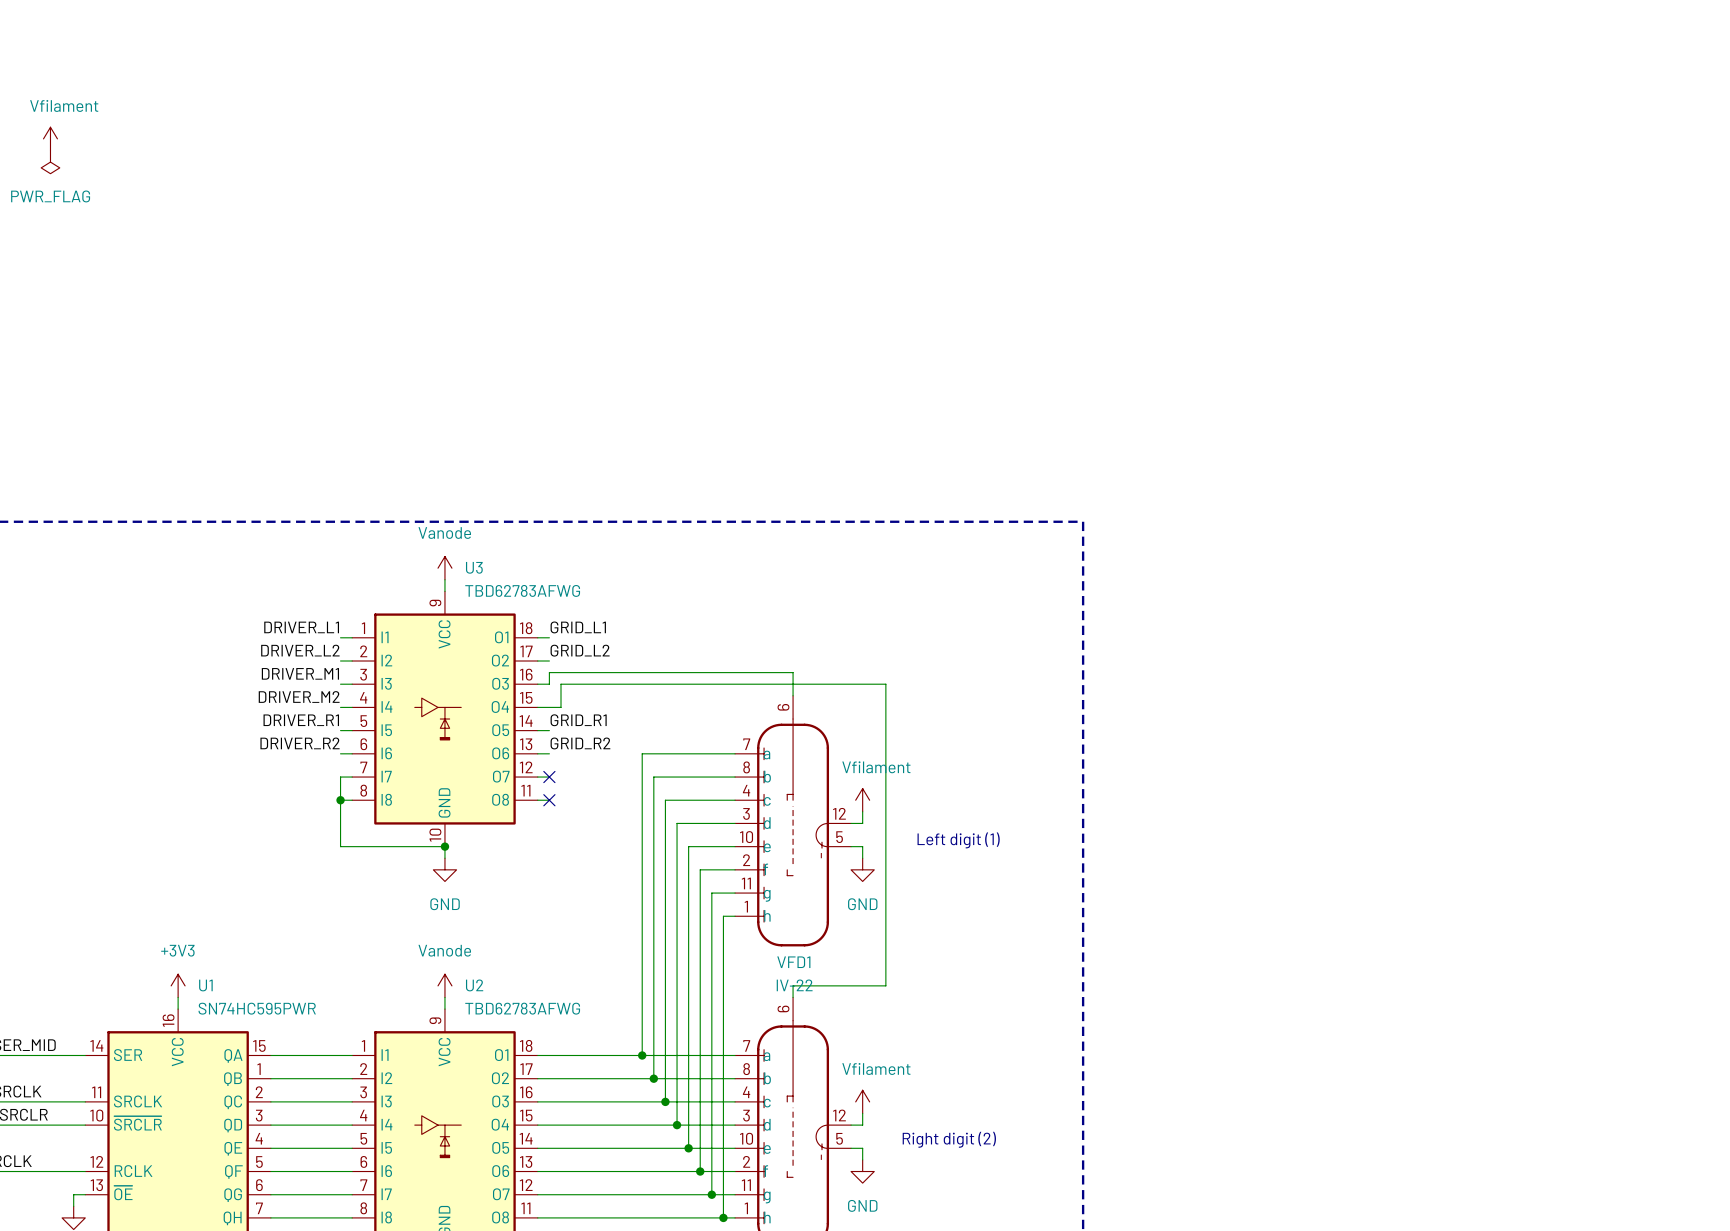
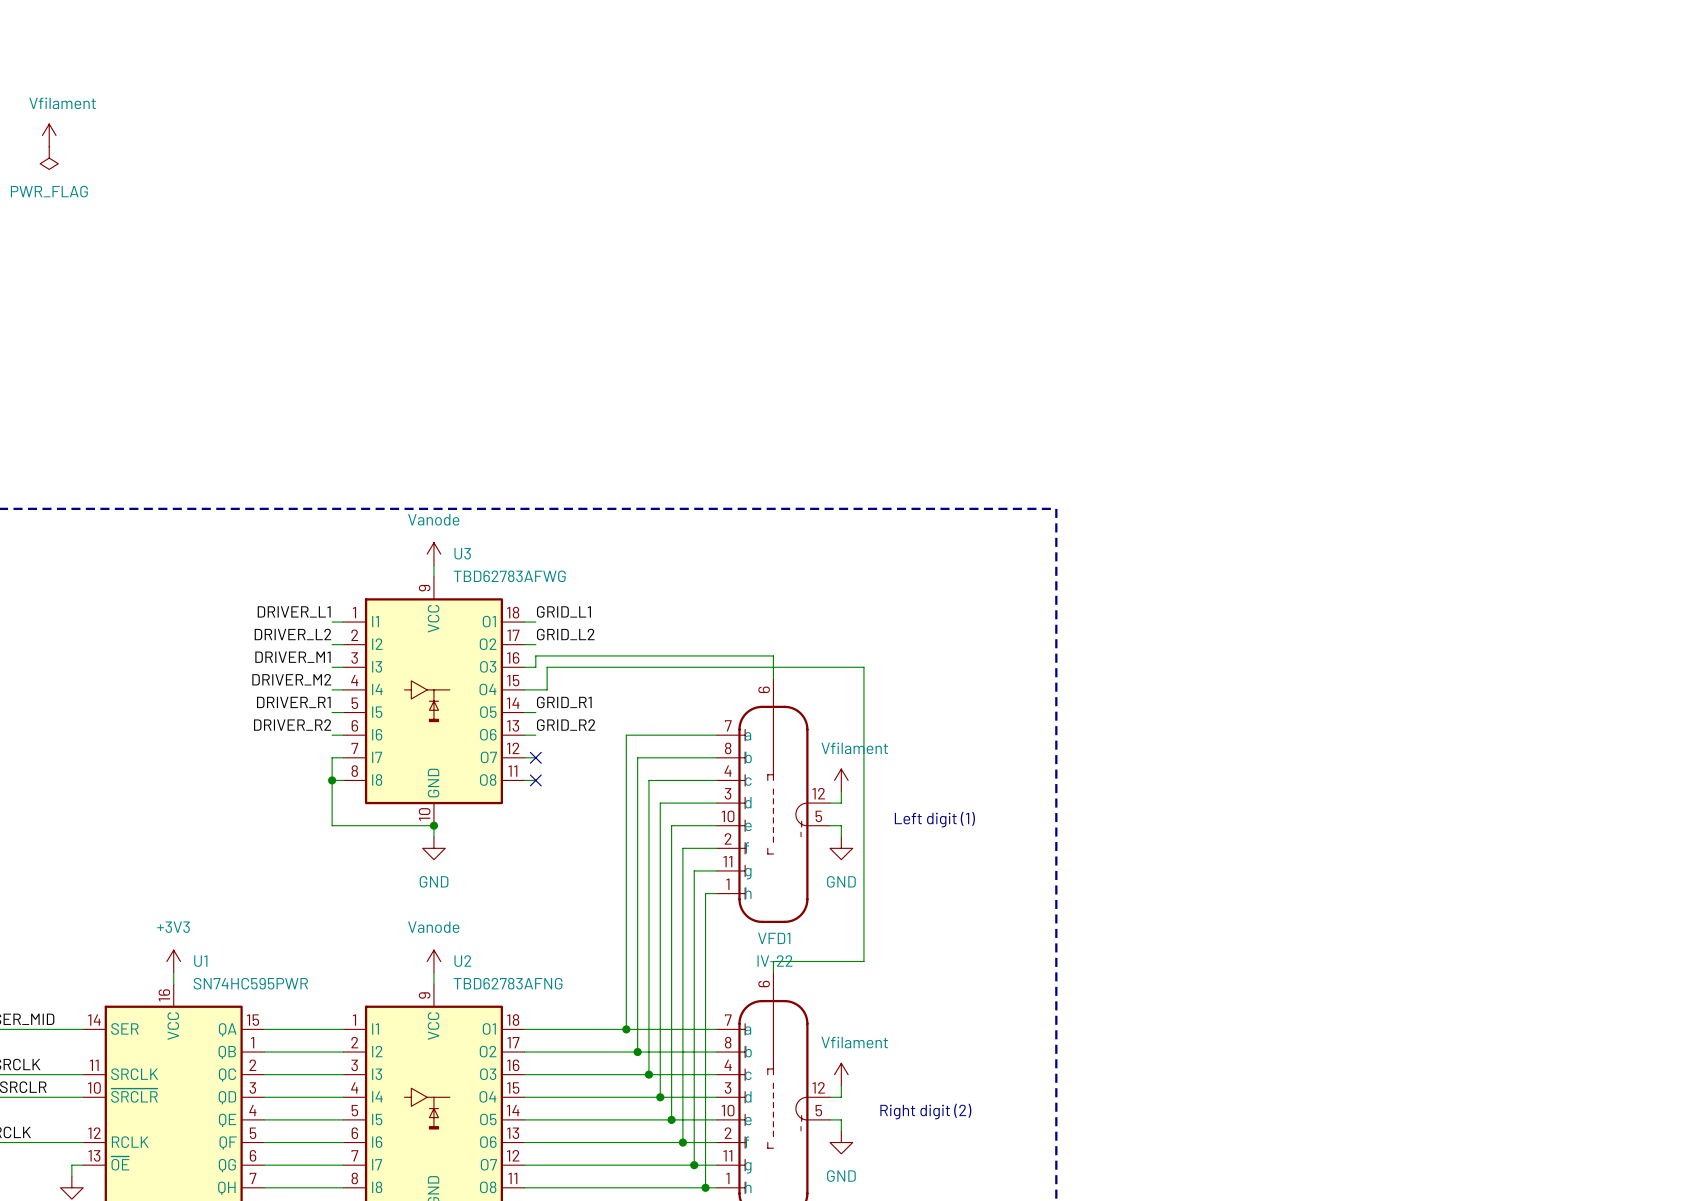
U2 value: TBD62783AFWG (522, 1008) -> TBD62783AFNG (508, 983)

